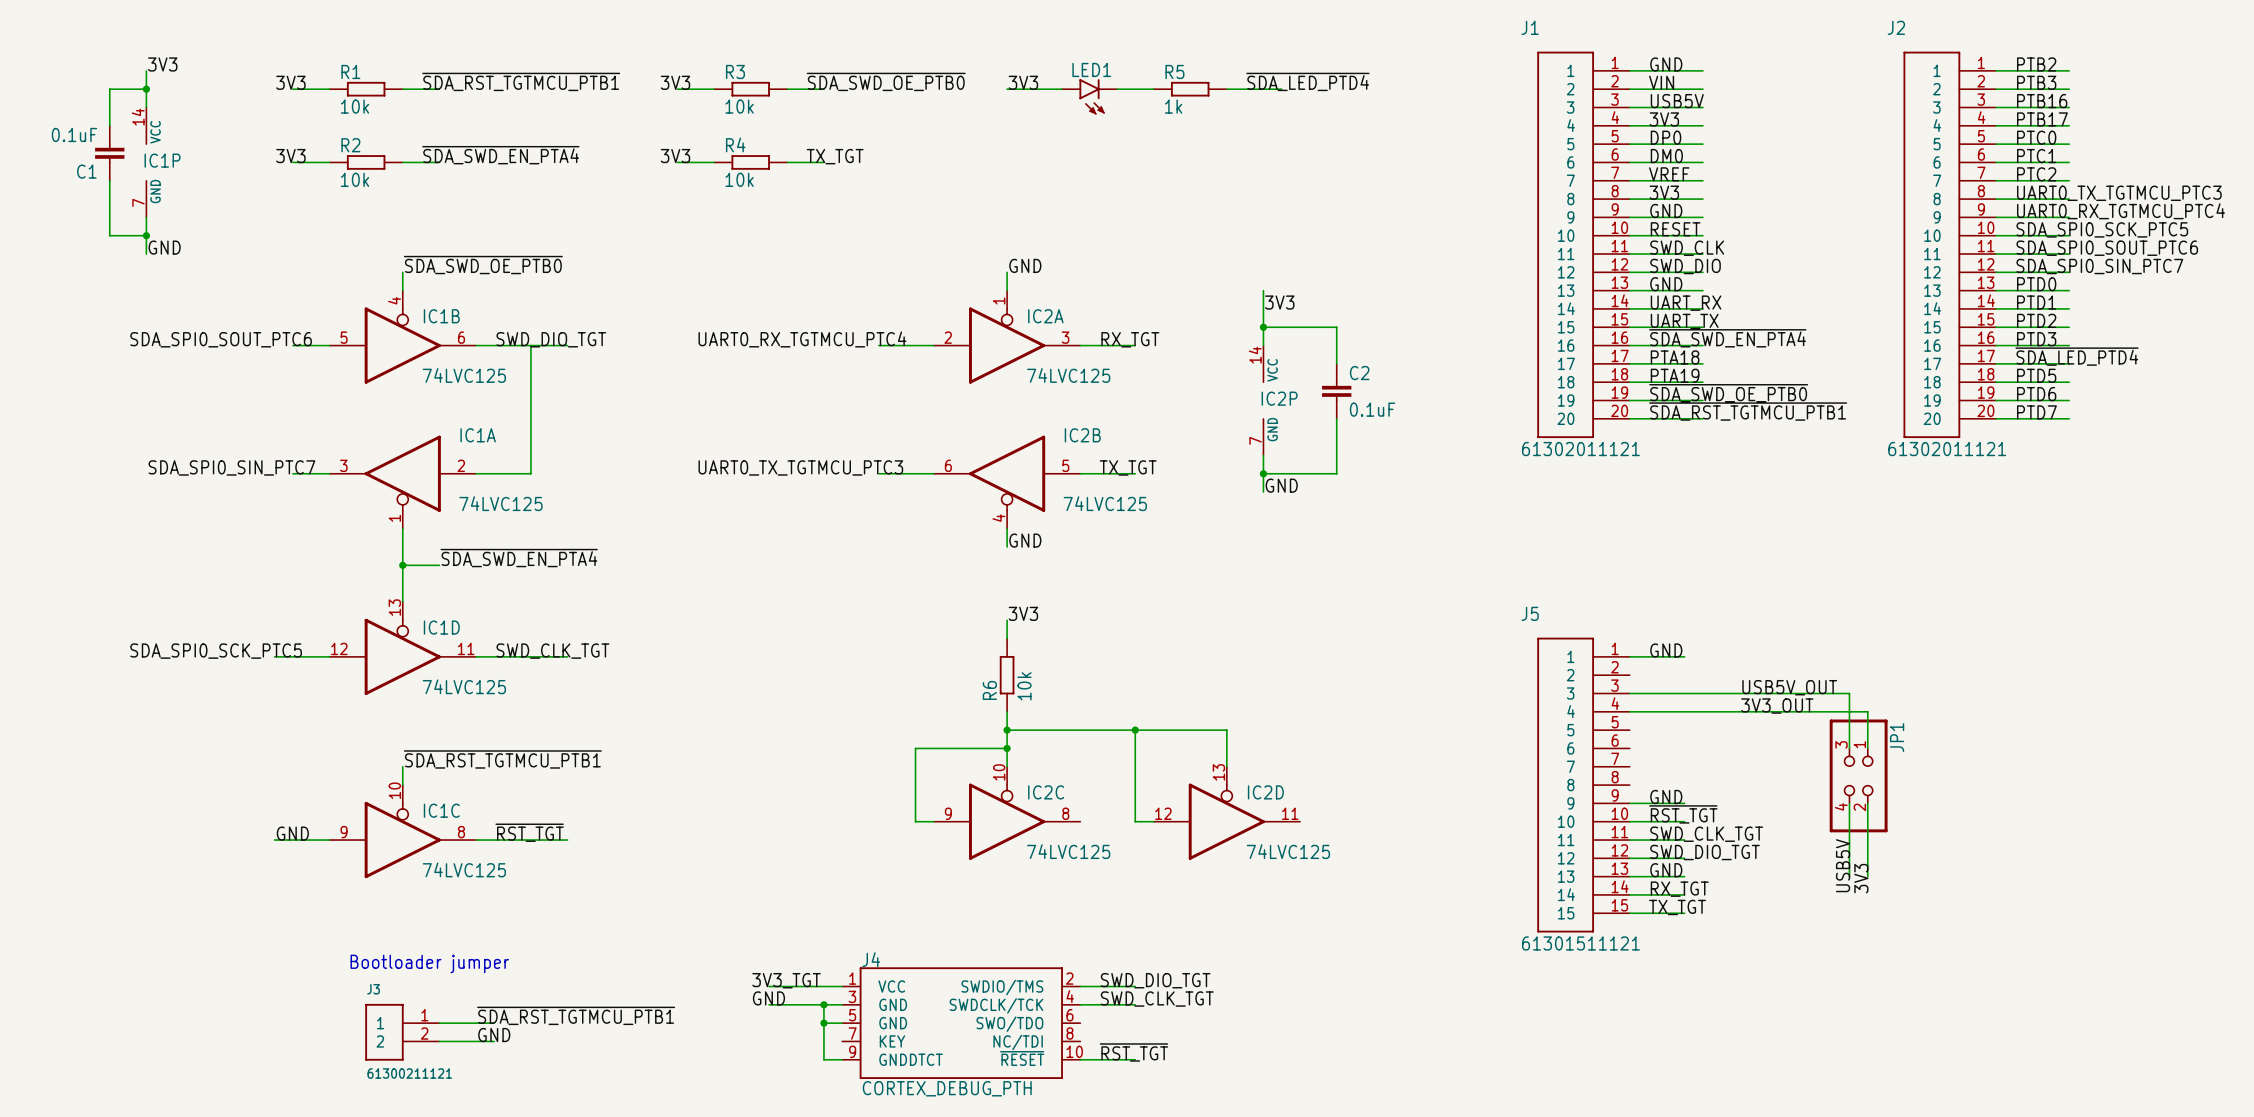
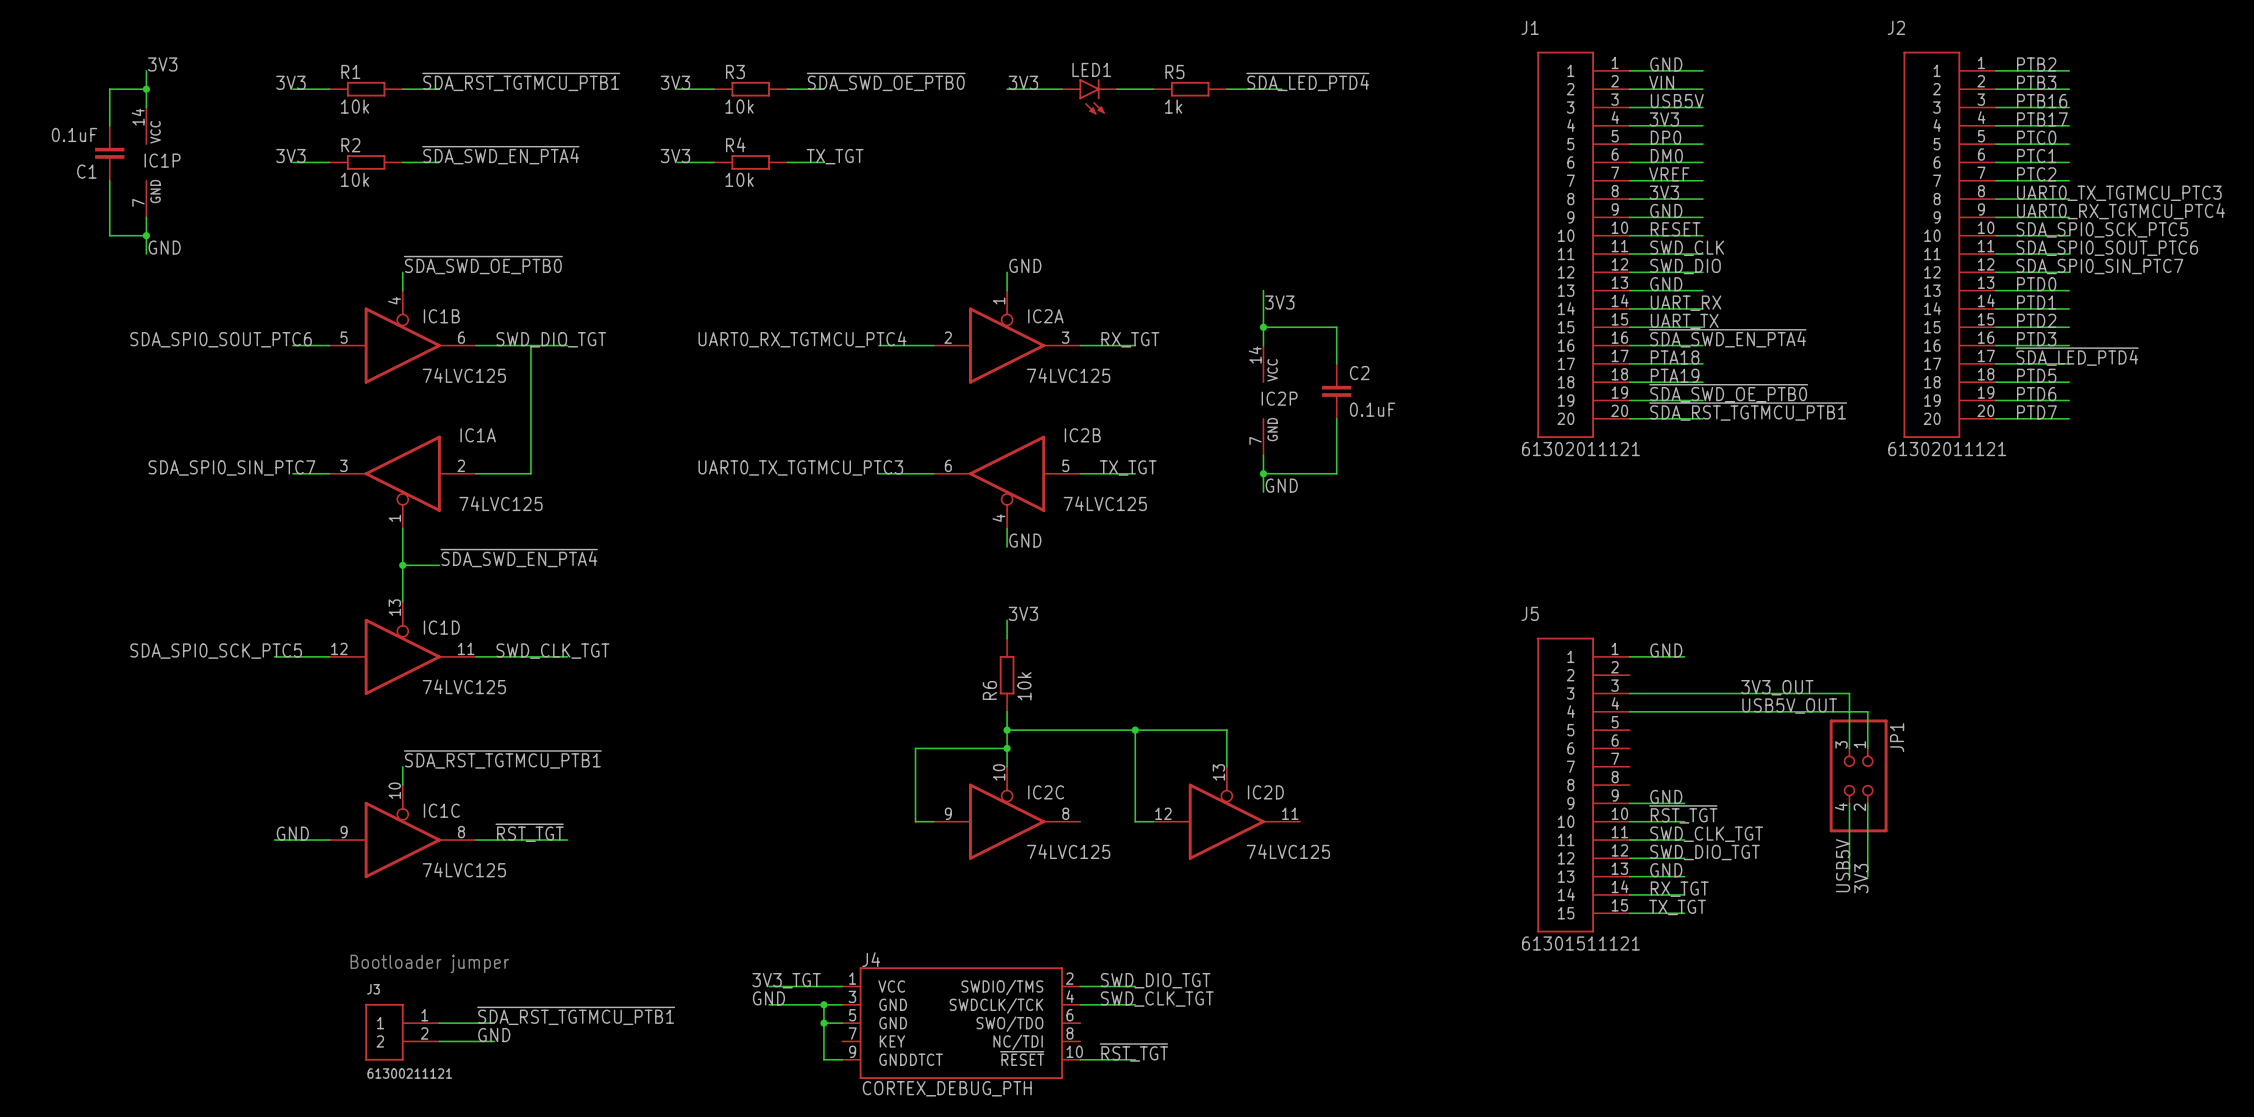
label: USB5V_OUT (1789, 687) -> 3V3_OUT (1777, 687)
label: 3V3_OUT (1777, 706) -> USB5V_OUT (1789, 706)

